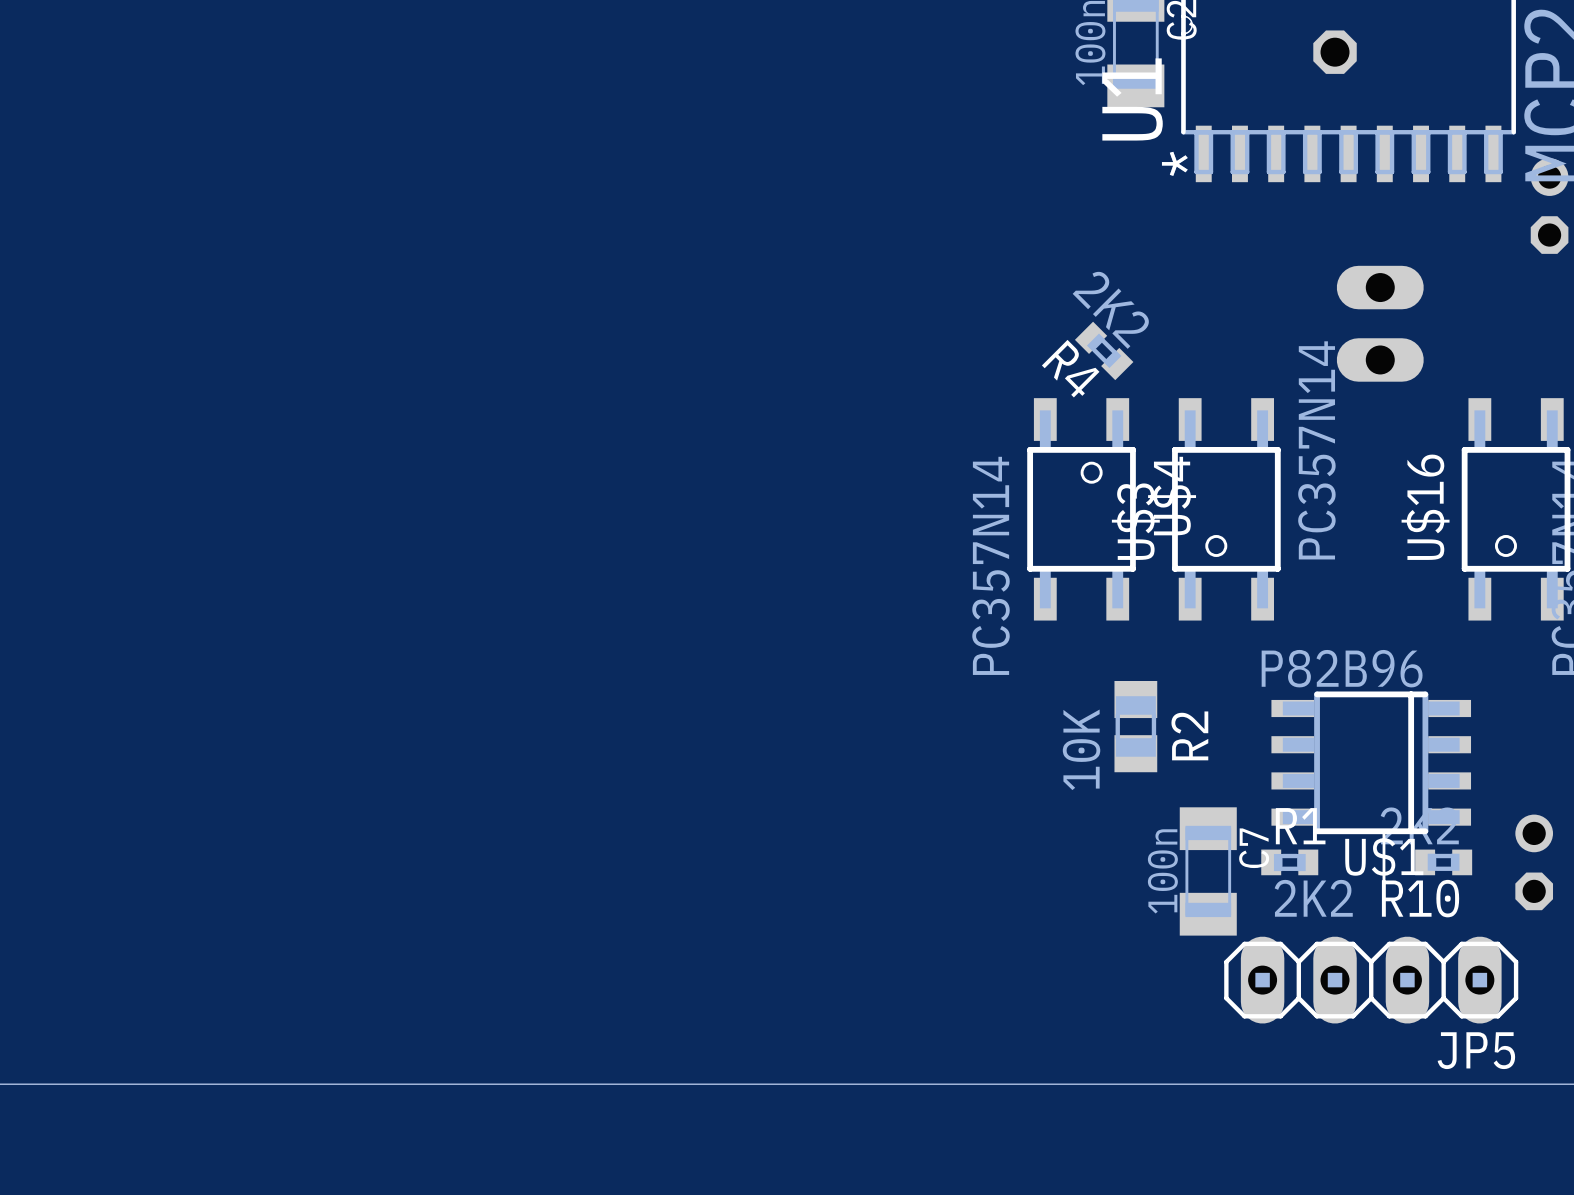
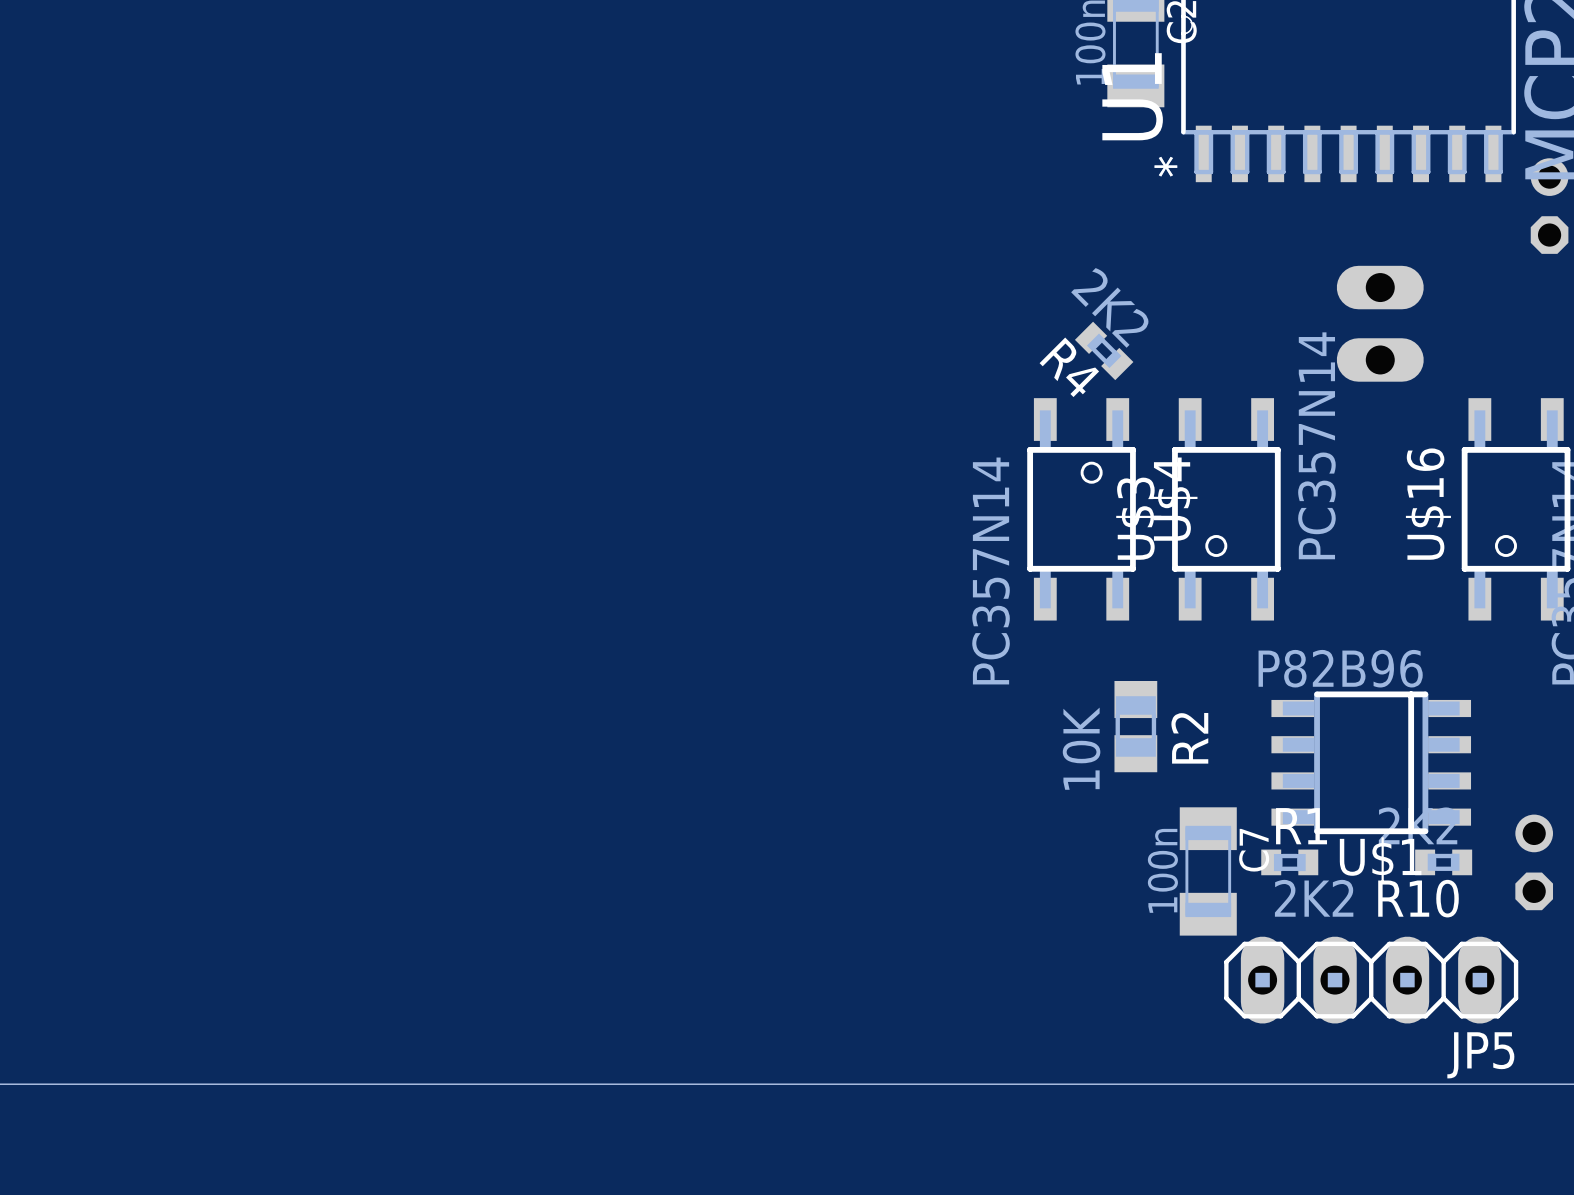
part: (1335, 52) -> none

